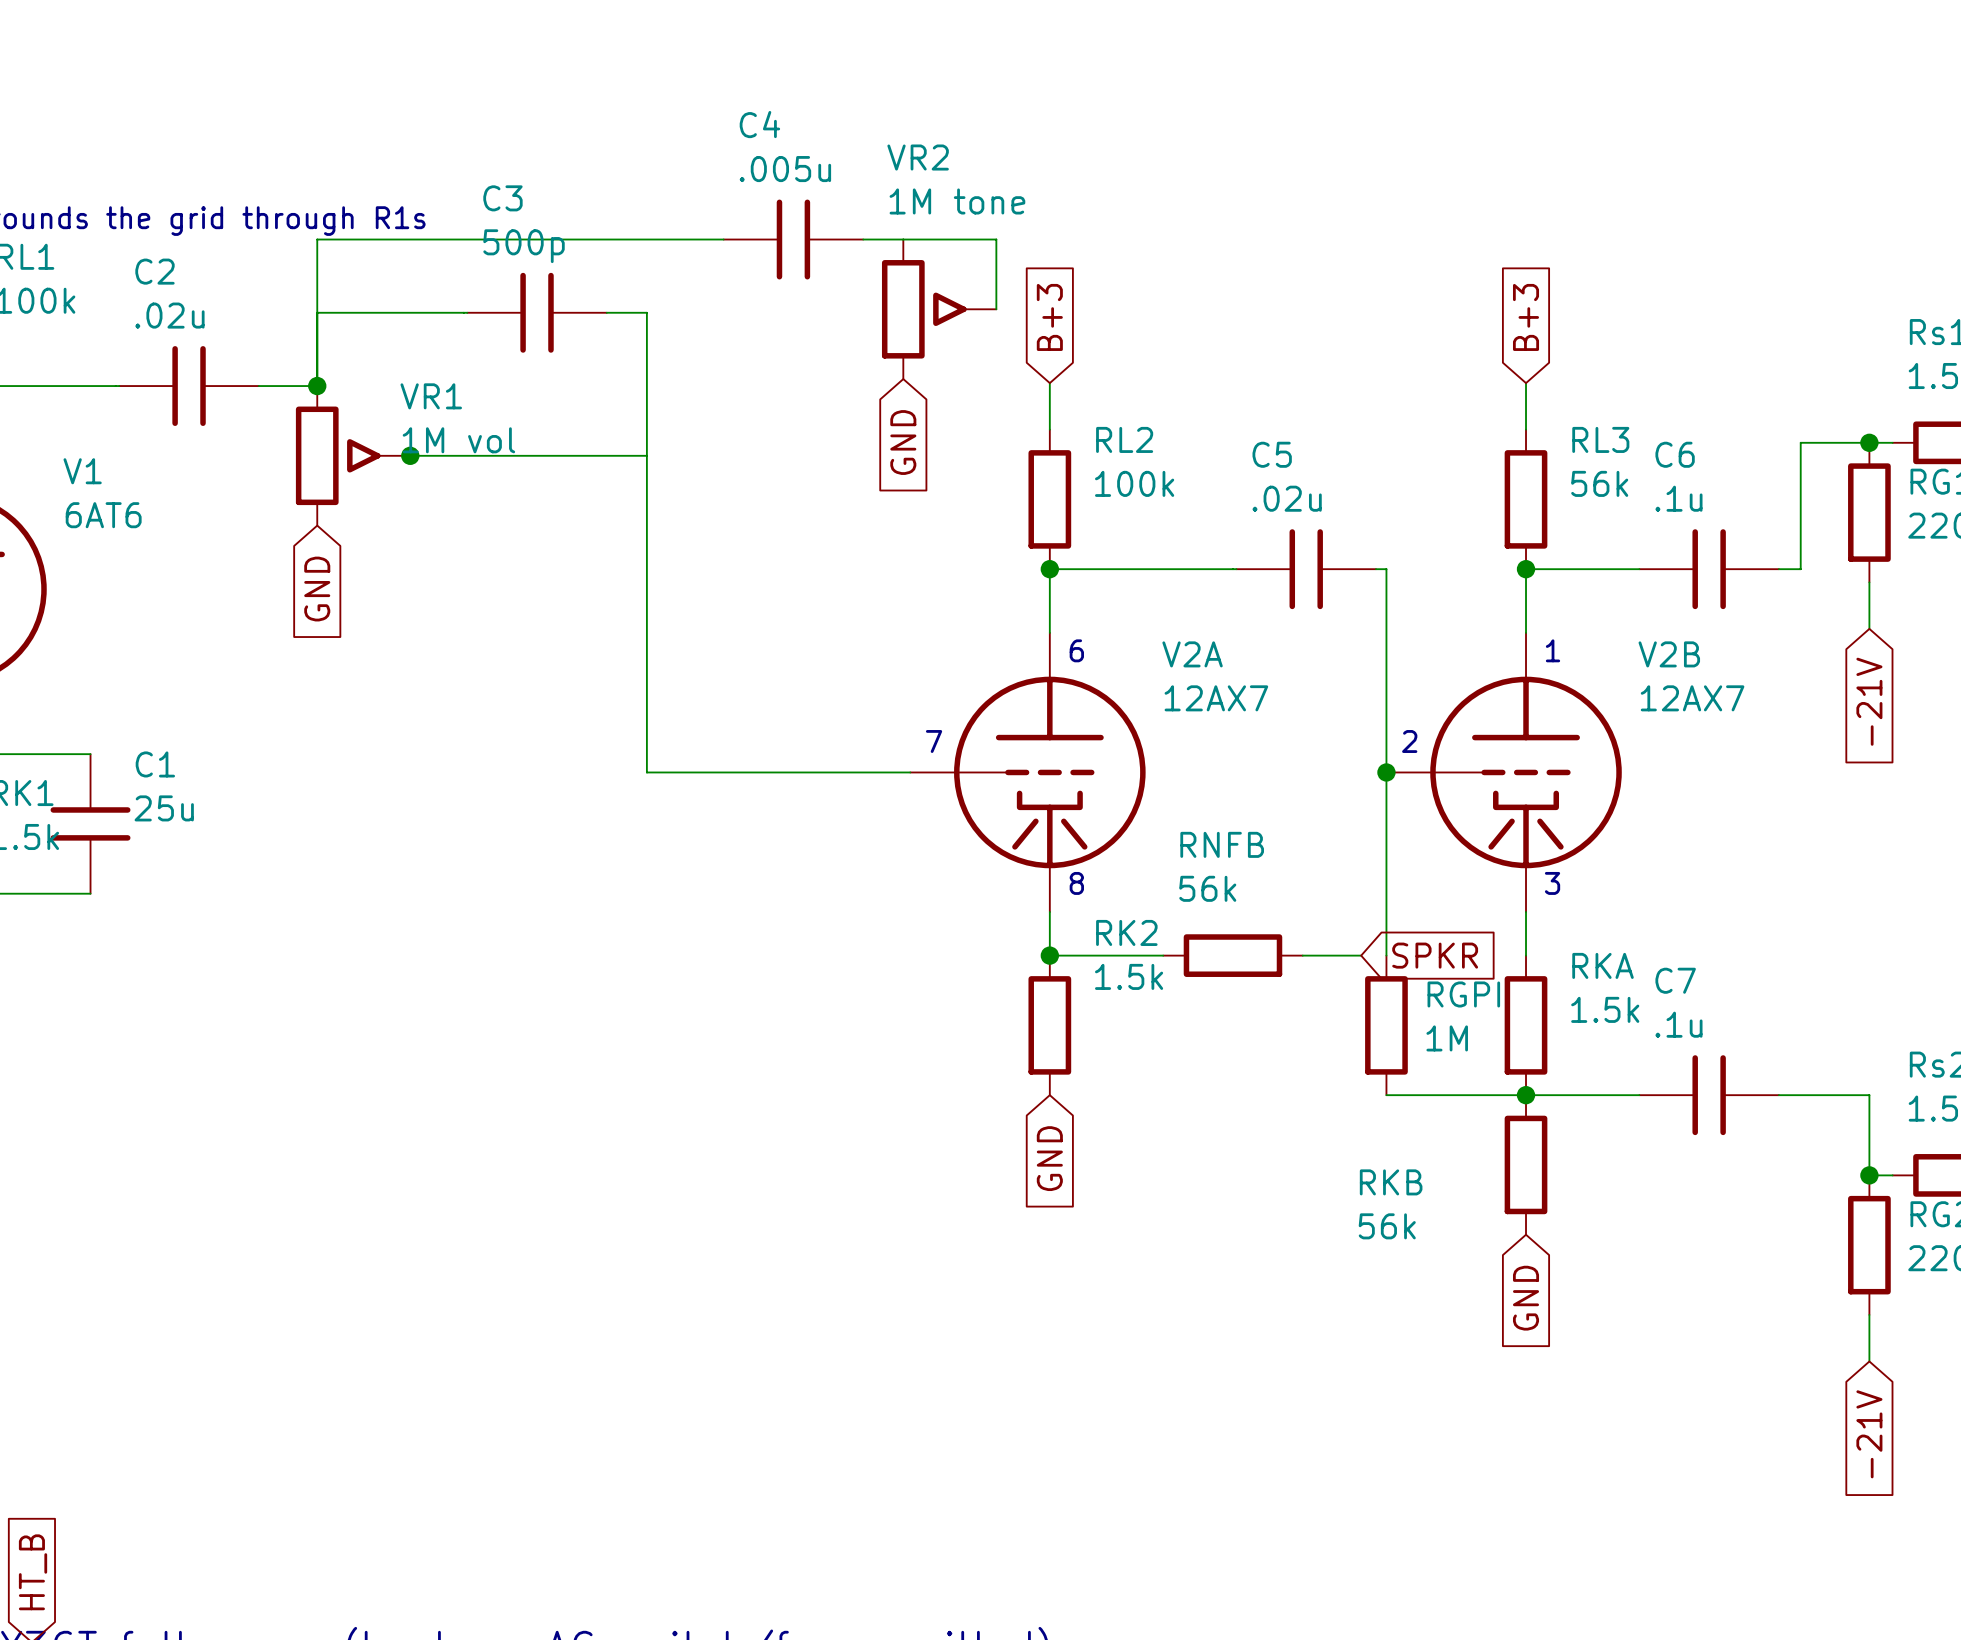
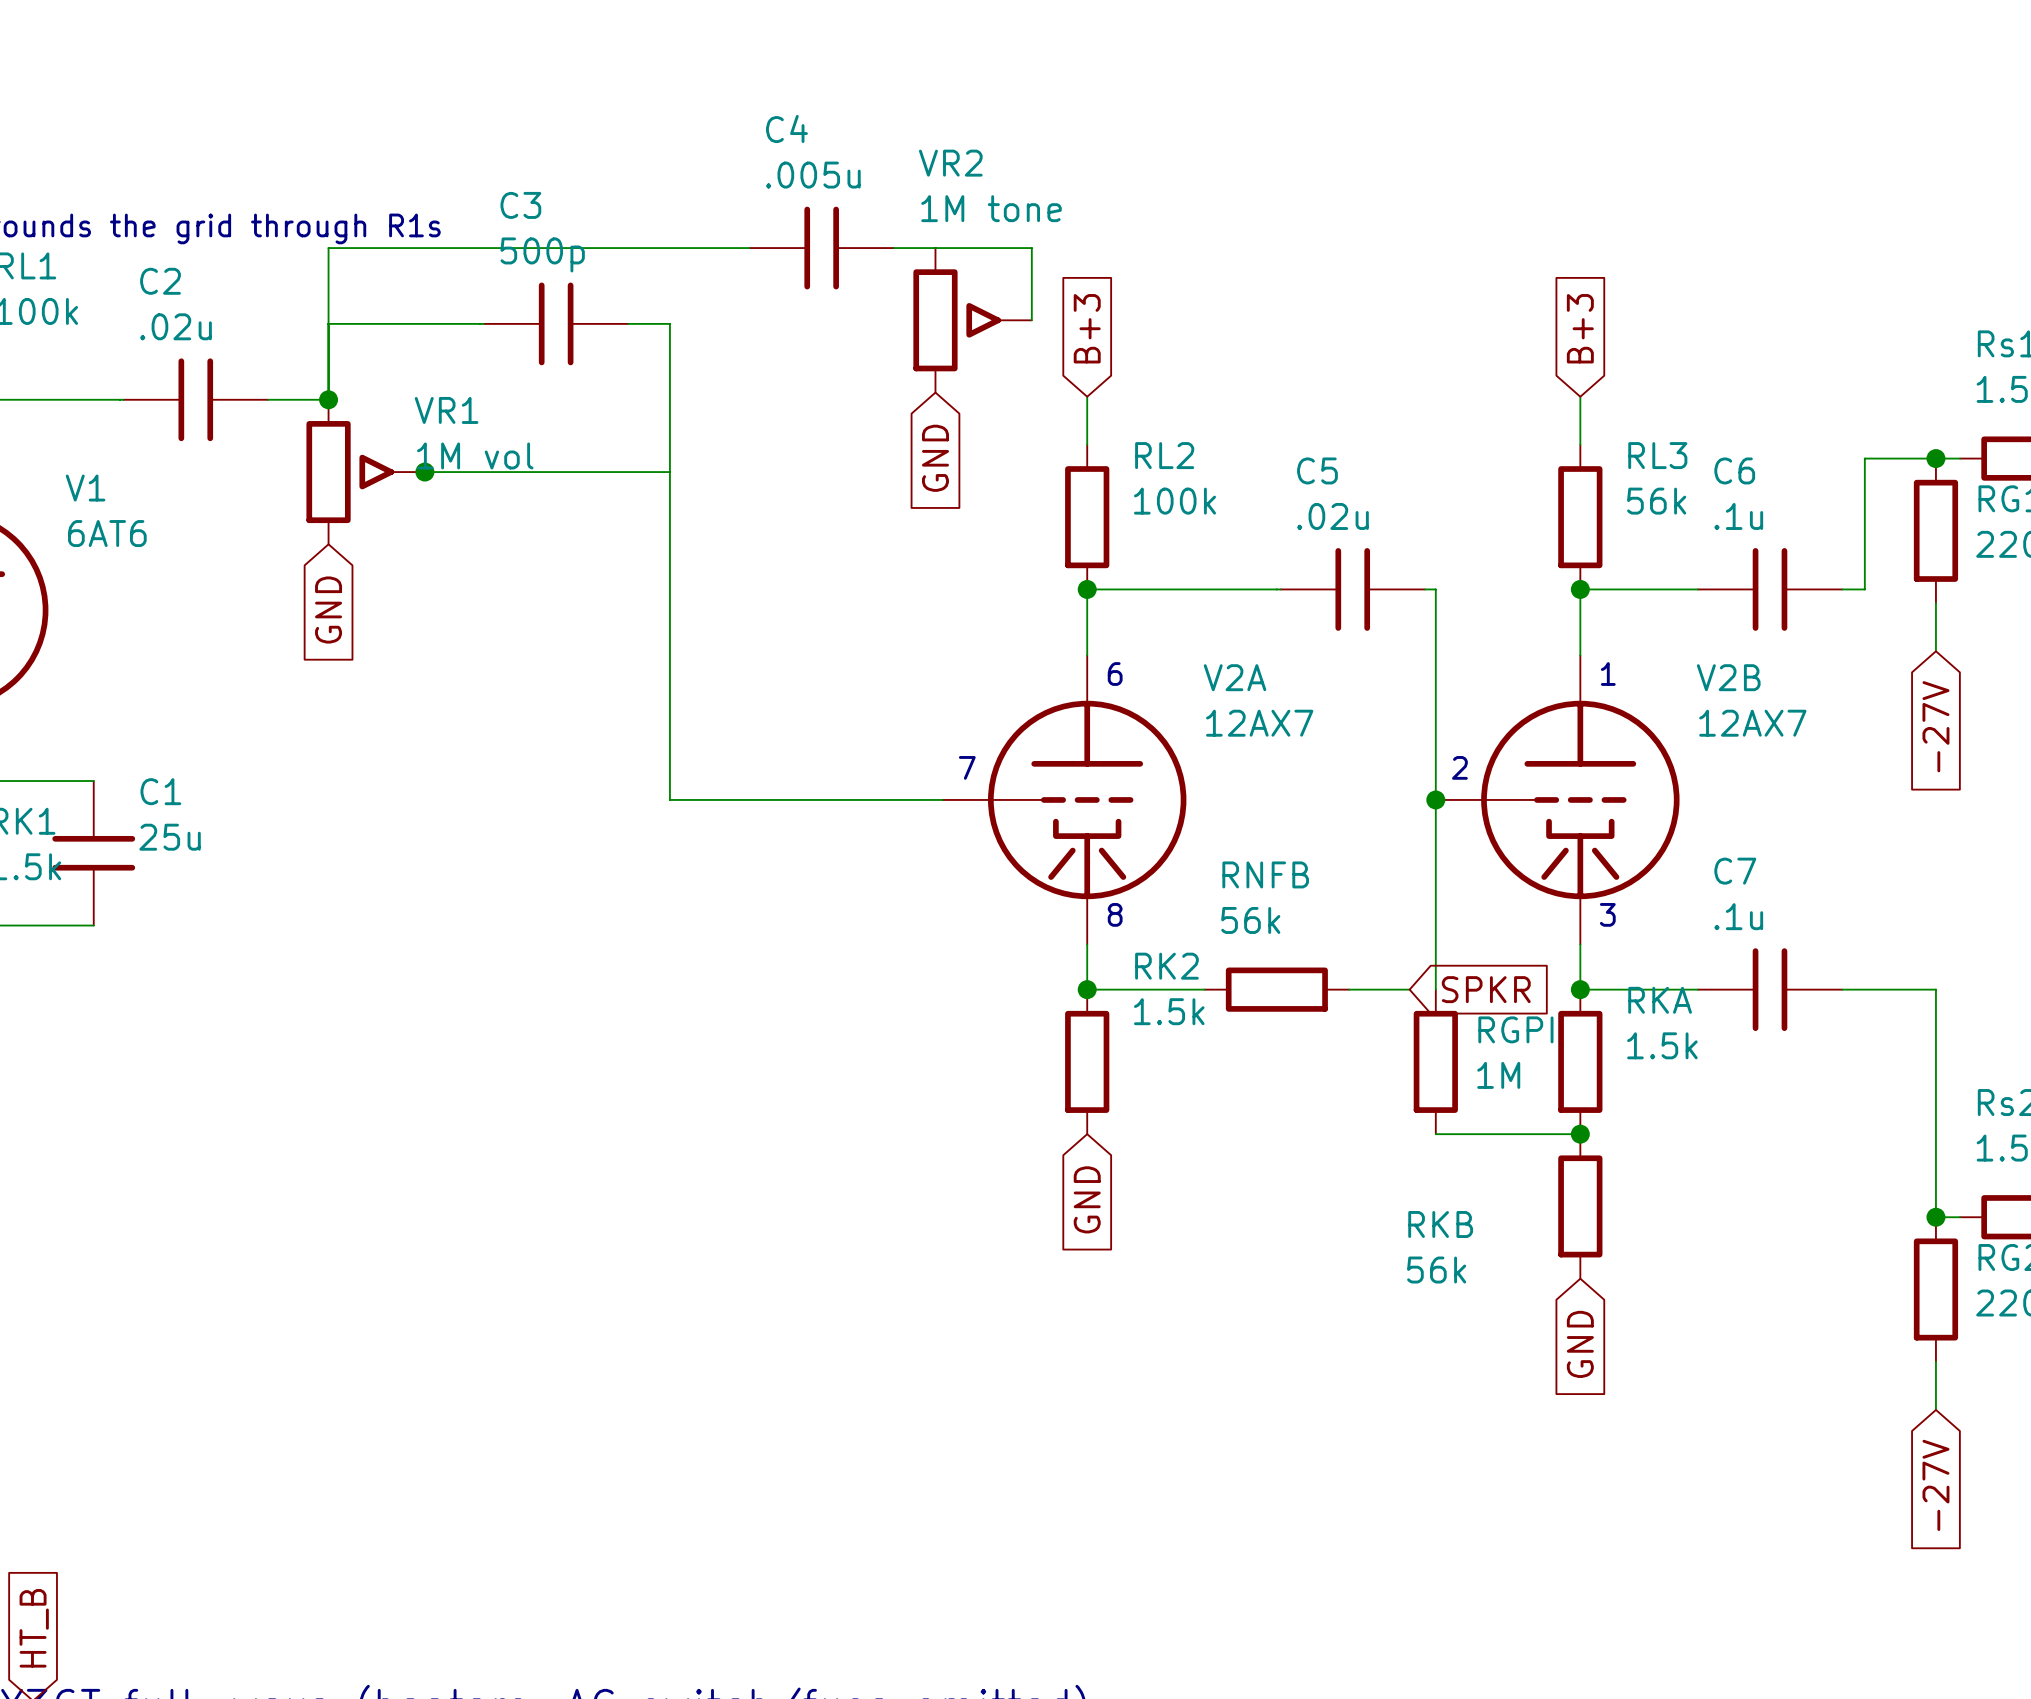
global label: -21V (1869, 701) -> -27V (1935, 726)
junction: none -> (1580, 989)
wire: (1526, 1095) (1639, 1095) -> (1580, 989) (1697, 989)
C7 position: (1709, 1095) -> (1770, 989)
wire: (1778, 1095) (1869, 1095) -> (1842, 989) (1935, 989) (1935, 1134)
global label: -21V (1869, 1434) -> -27V (1935, 1485)

